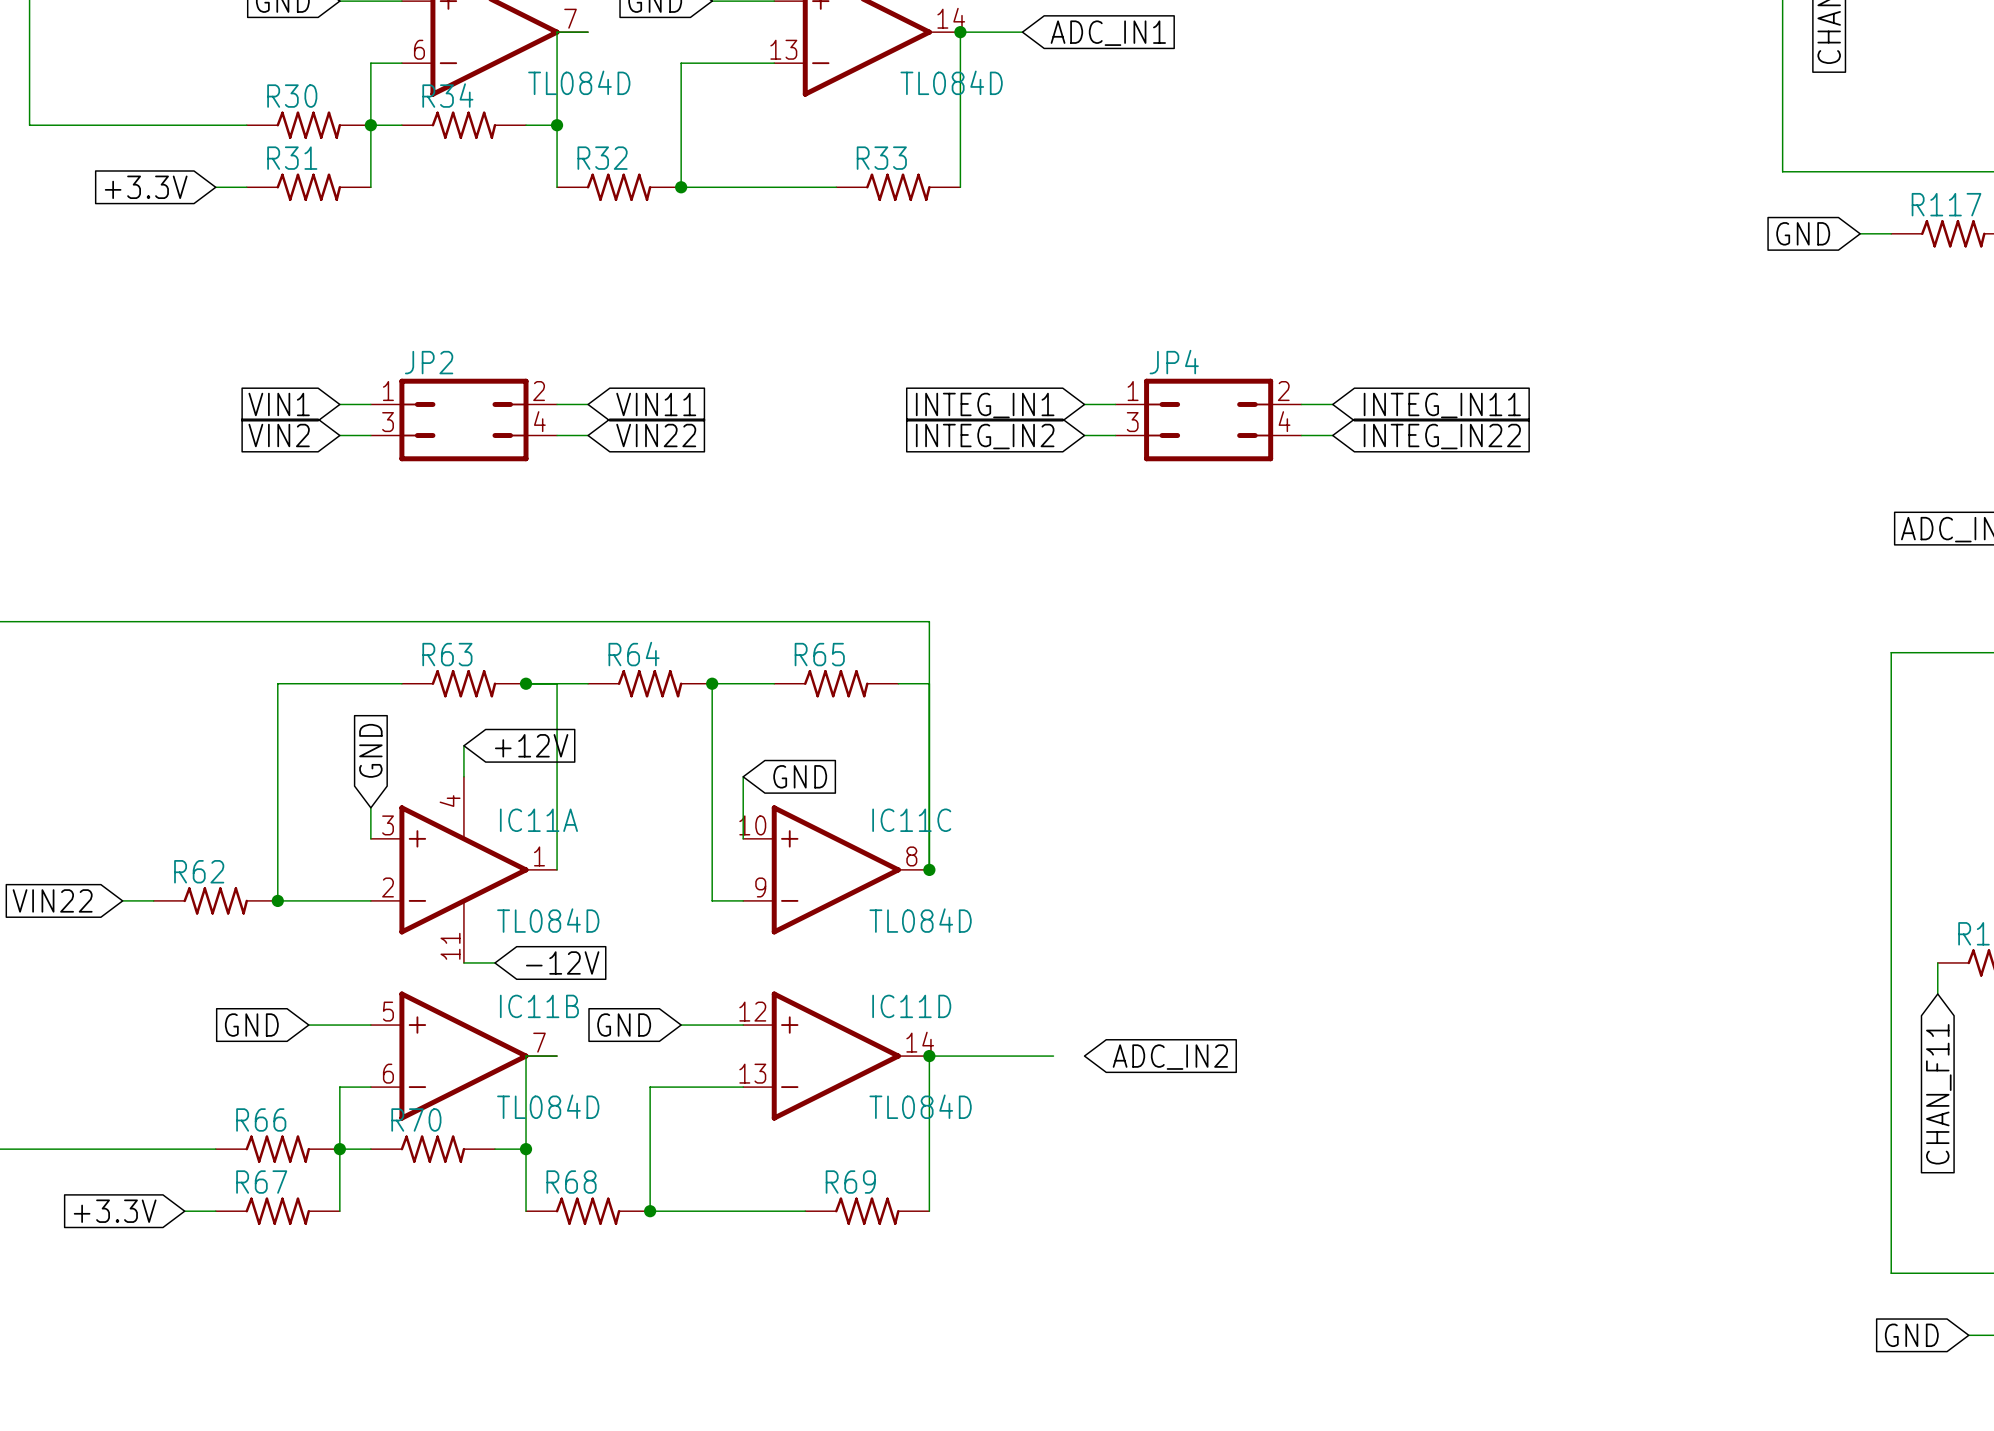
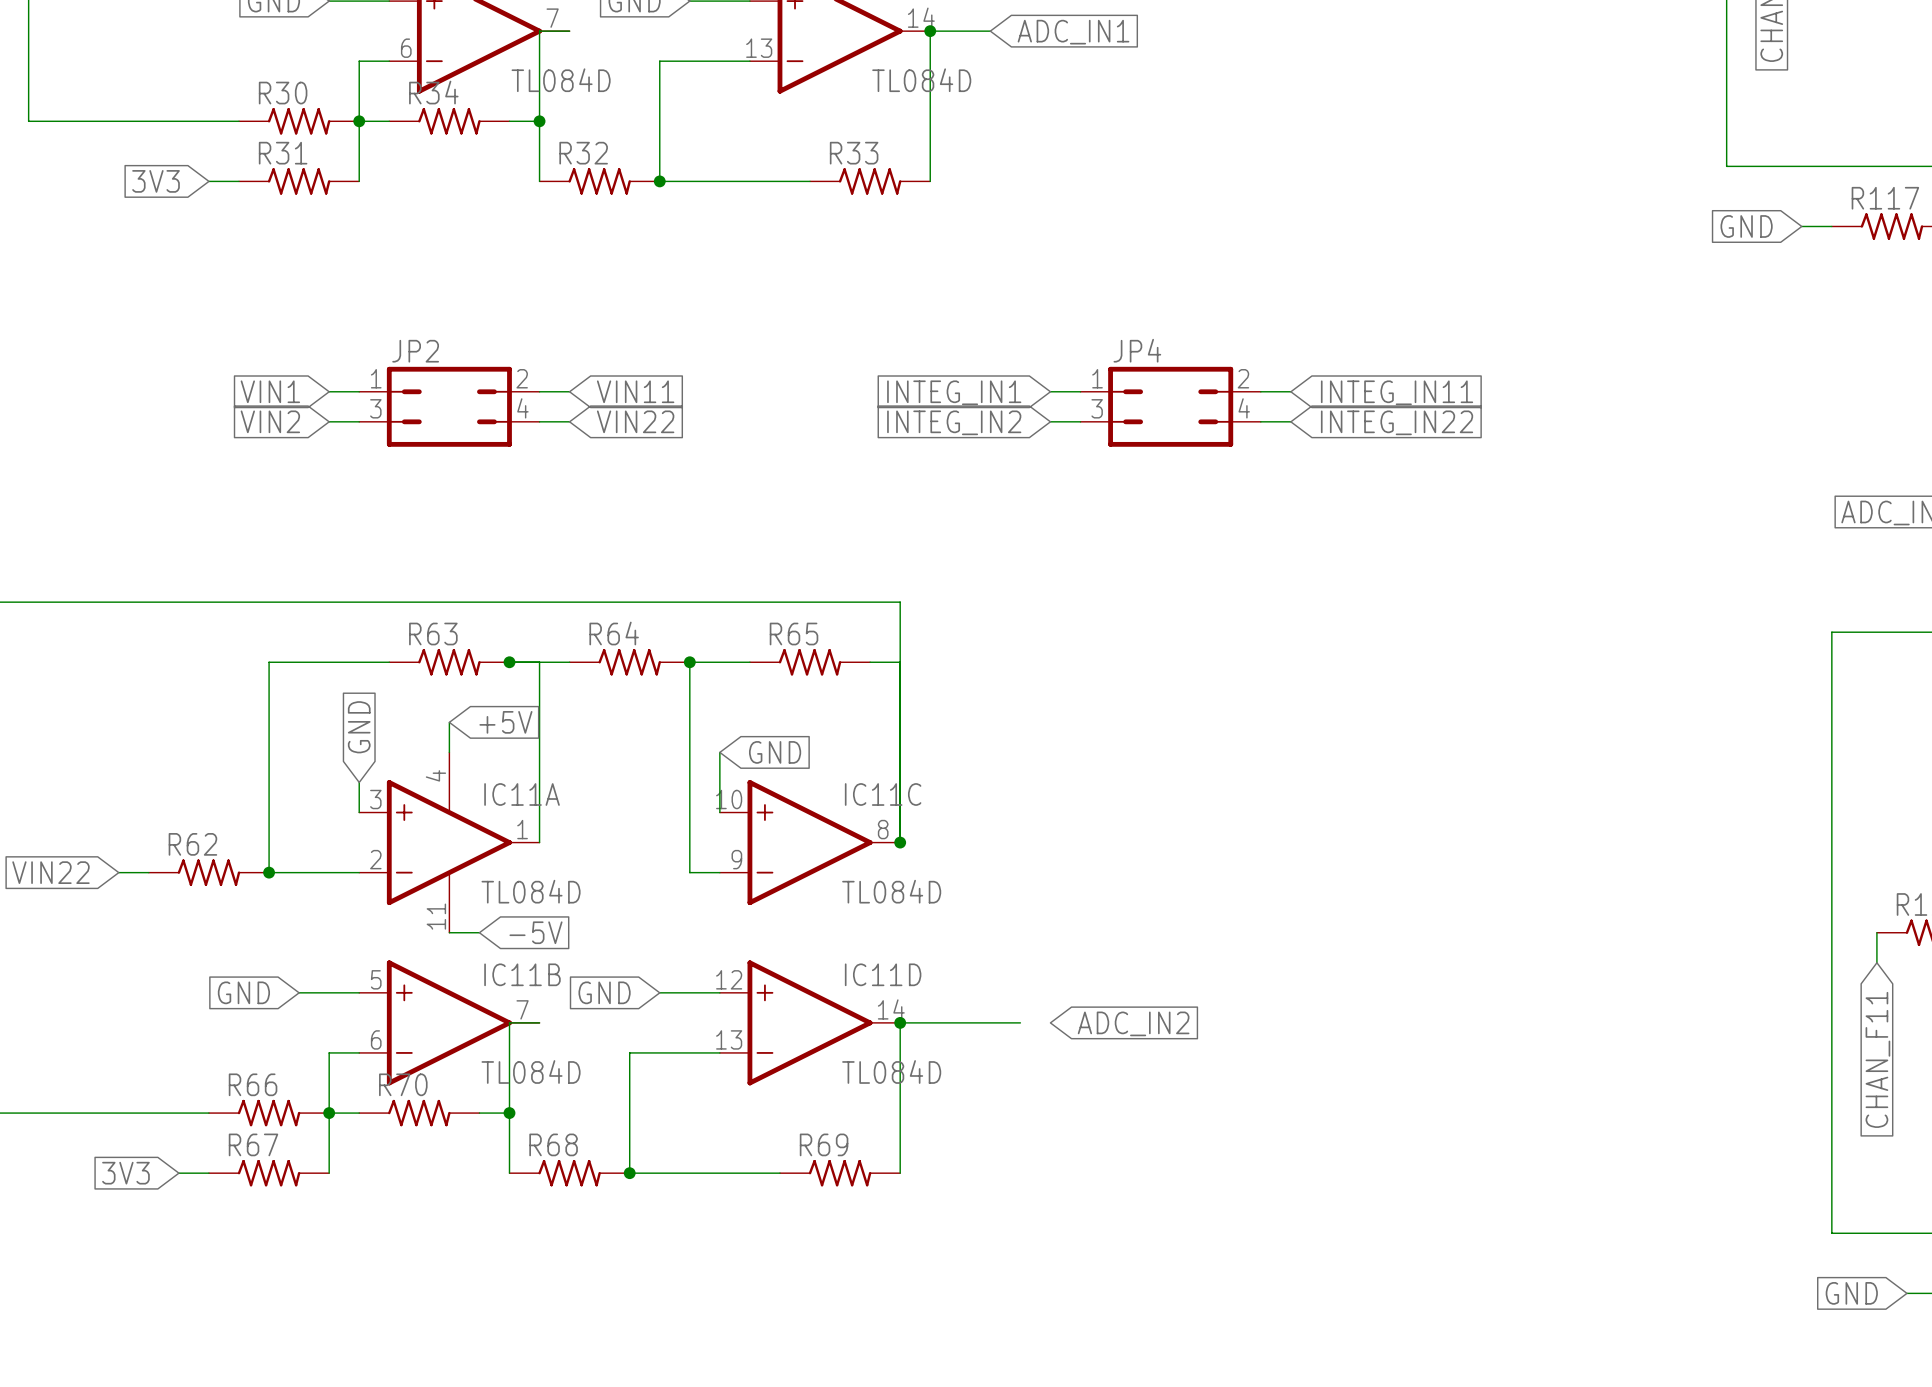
global label: +3.3V (146, 187) -> 3V3 (156, 181)
global label: +12V (531, 745) -> +5V (505, 722)
global label: -12V (562, 962) -> -5V (536, 932)
global label: +3.3V (115, 1211) -> 3V3 (125, 1173)

